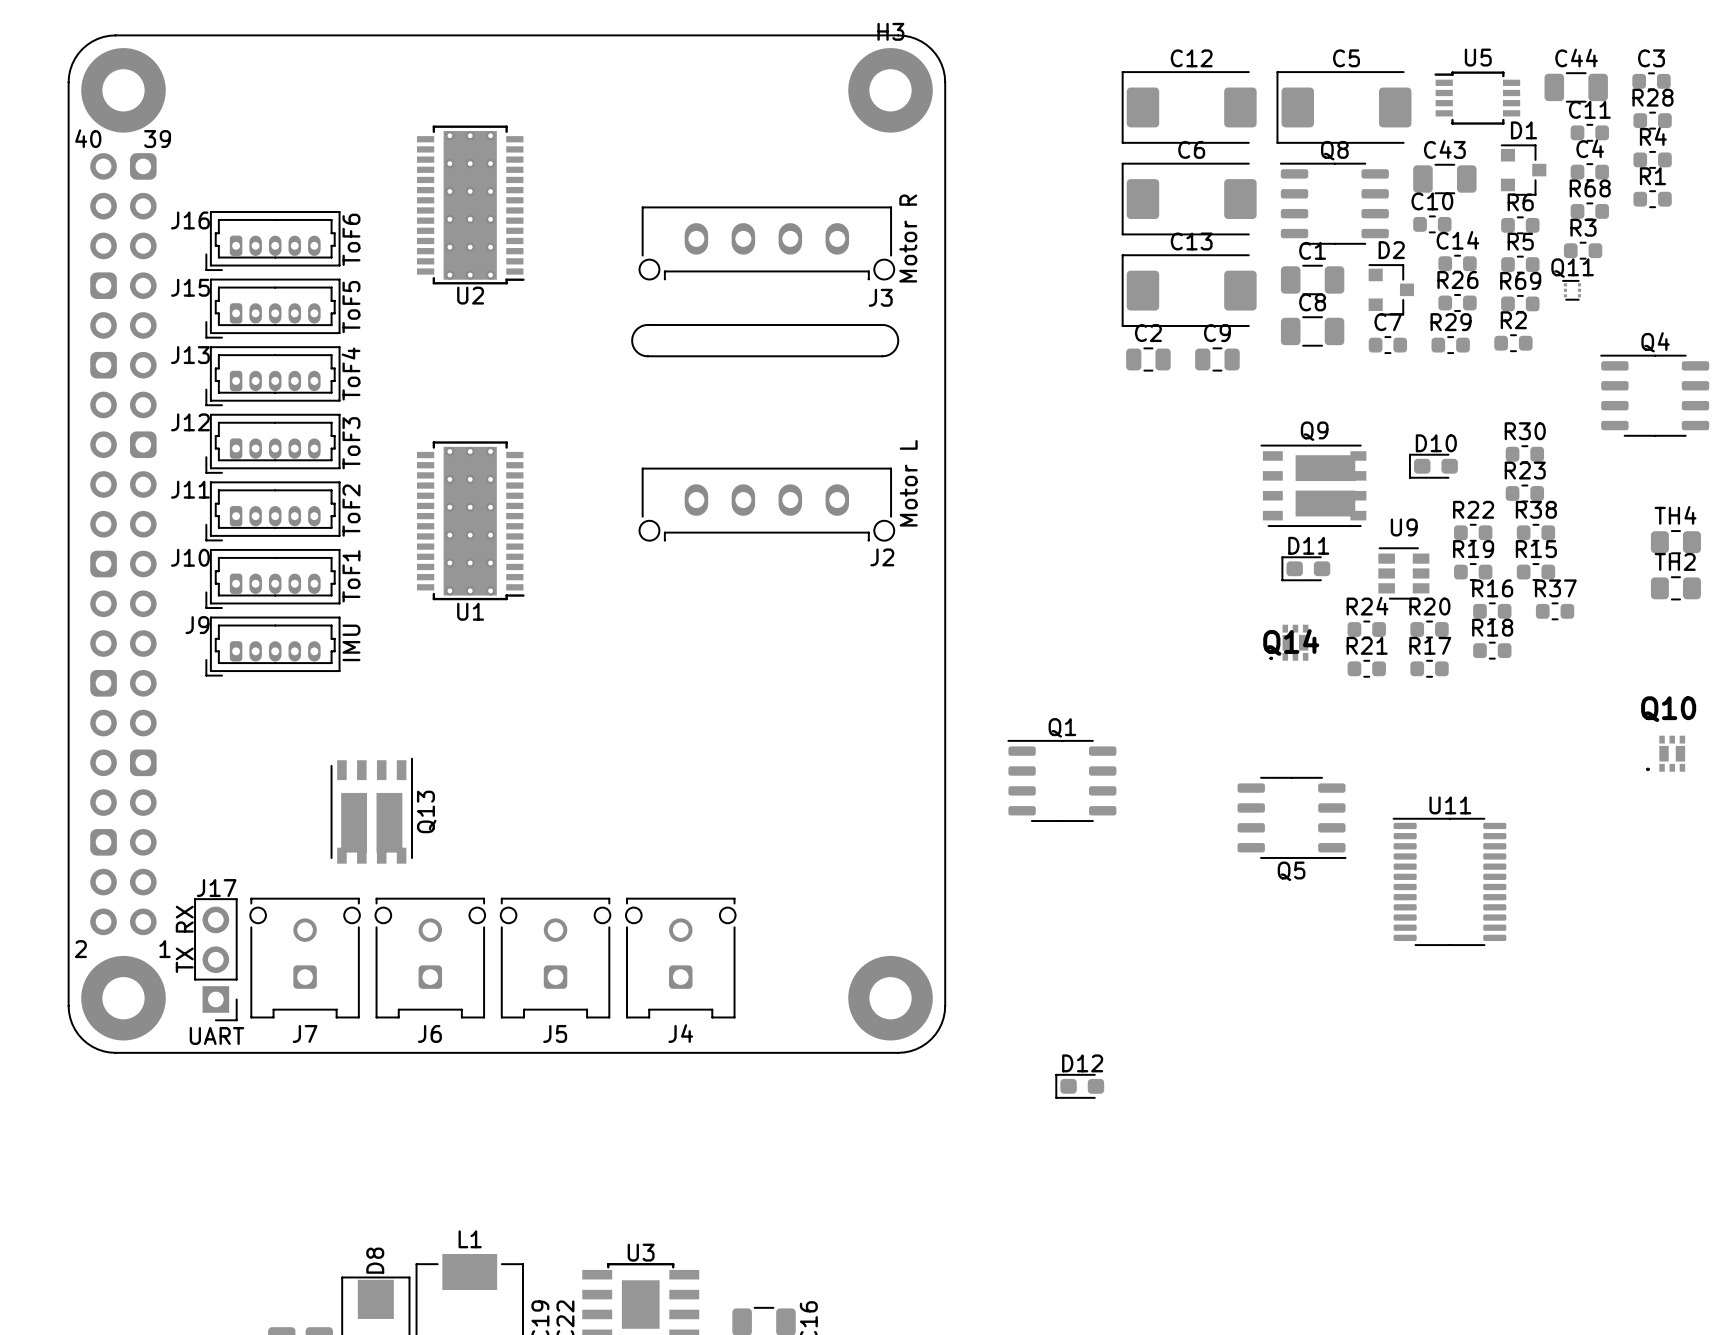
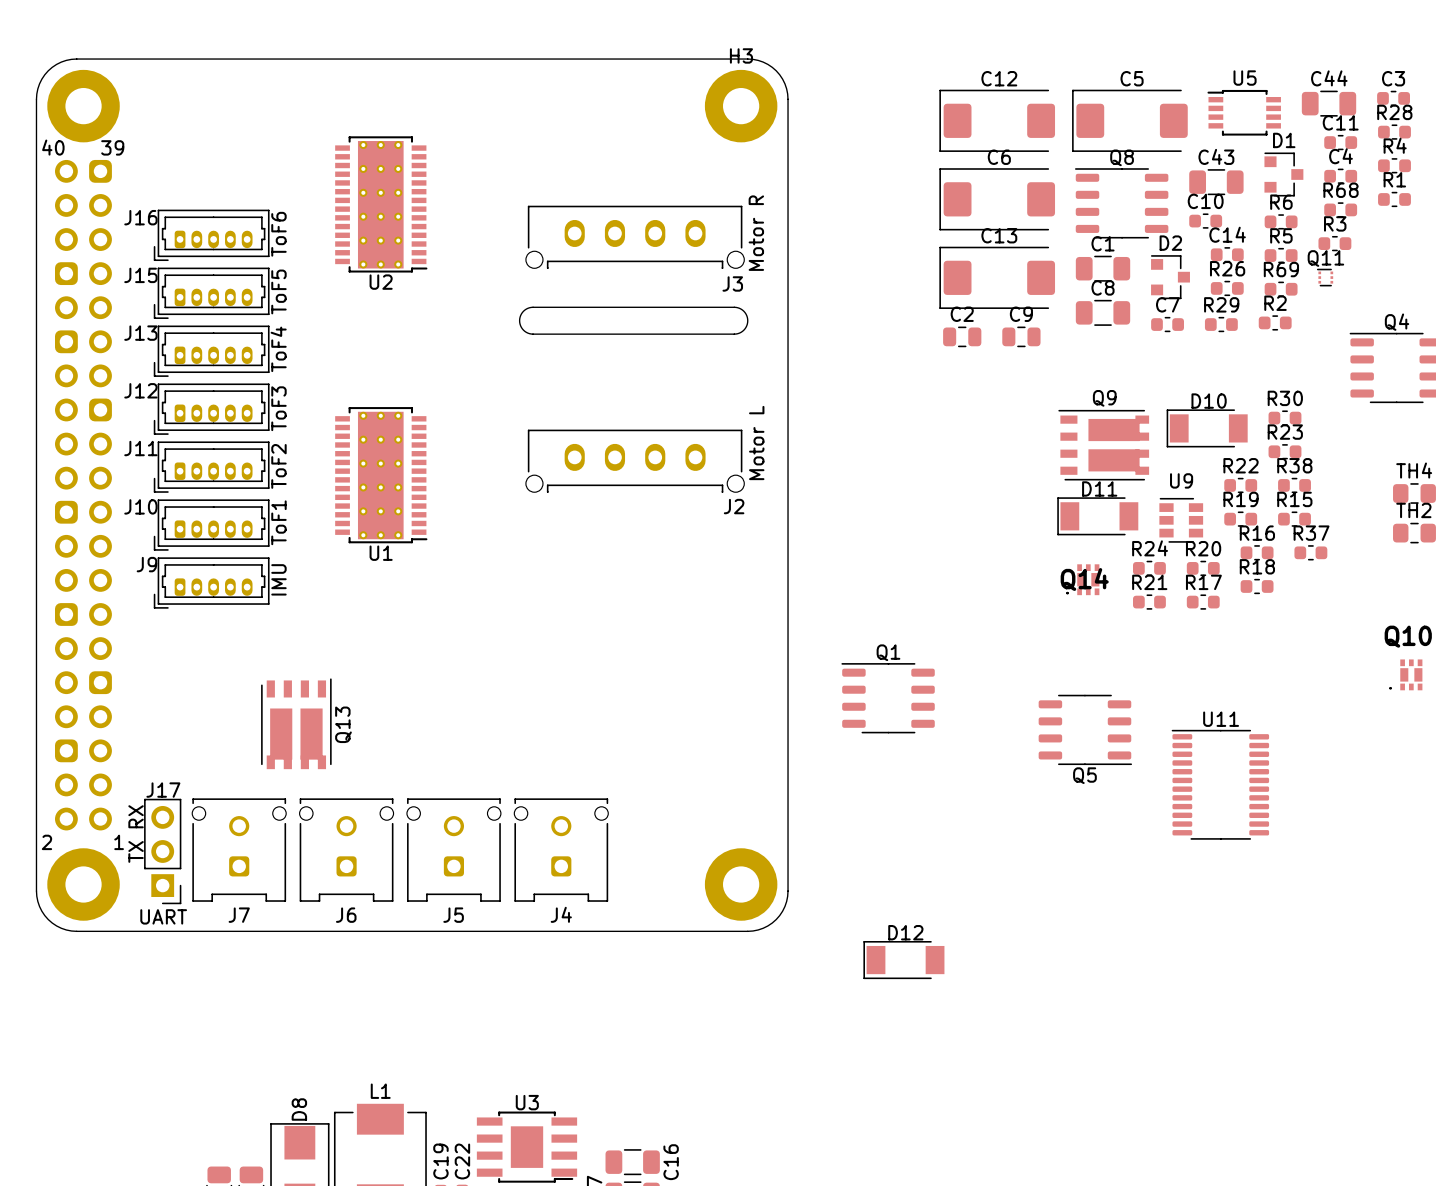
D10 footprint: [1409, 453, 1458, 479] -> [1166, 409, 1248, 448]
D11 footprint: [1281, 556, 1331, 582] -> [1057, 497, 1139, 536]
D12 footprint: [1055, 1073, 1105, 1099] -> [863, 941, 945, 980]

